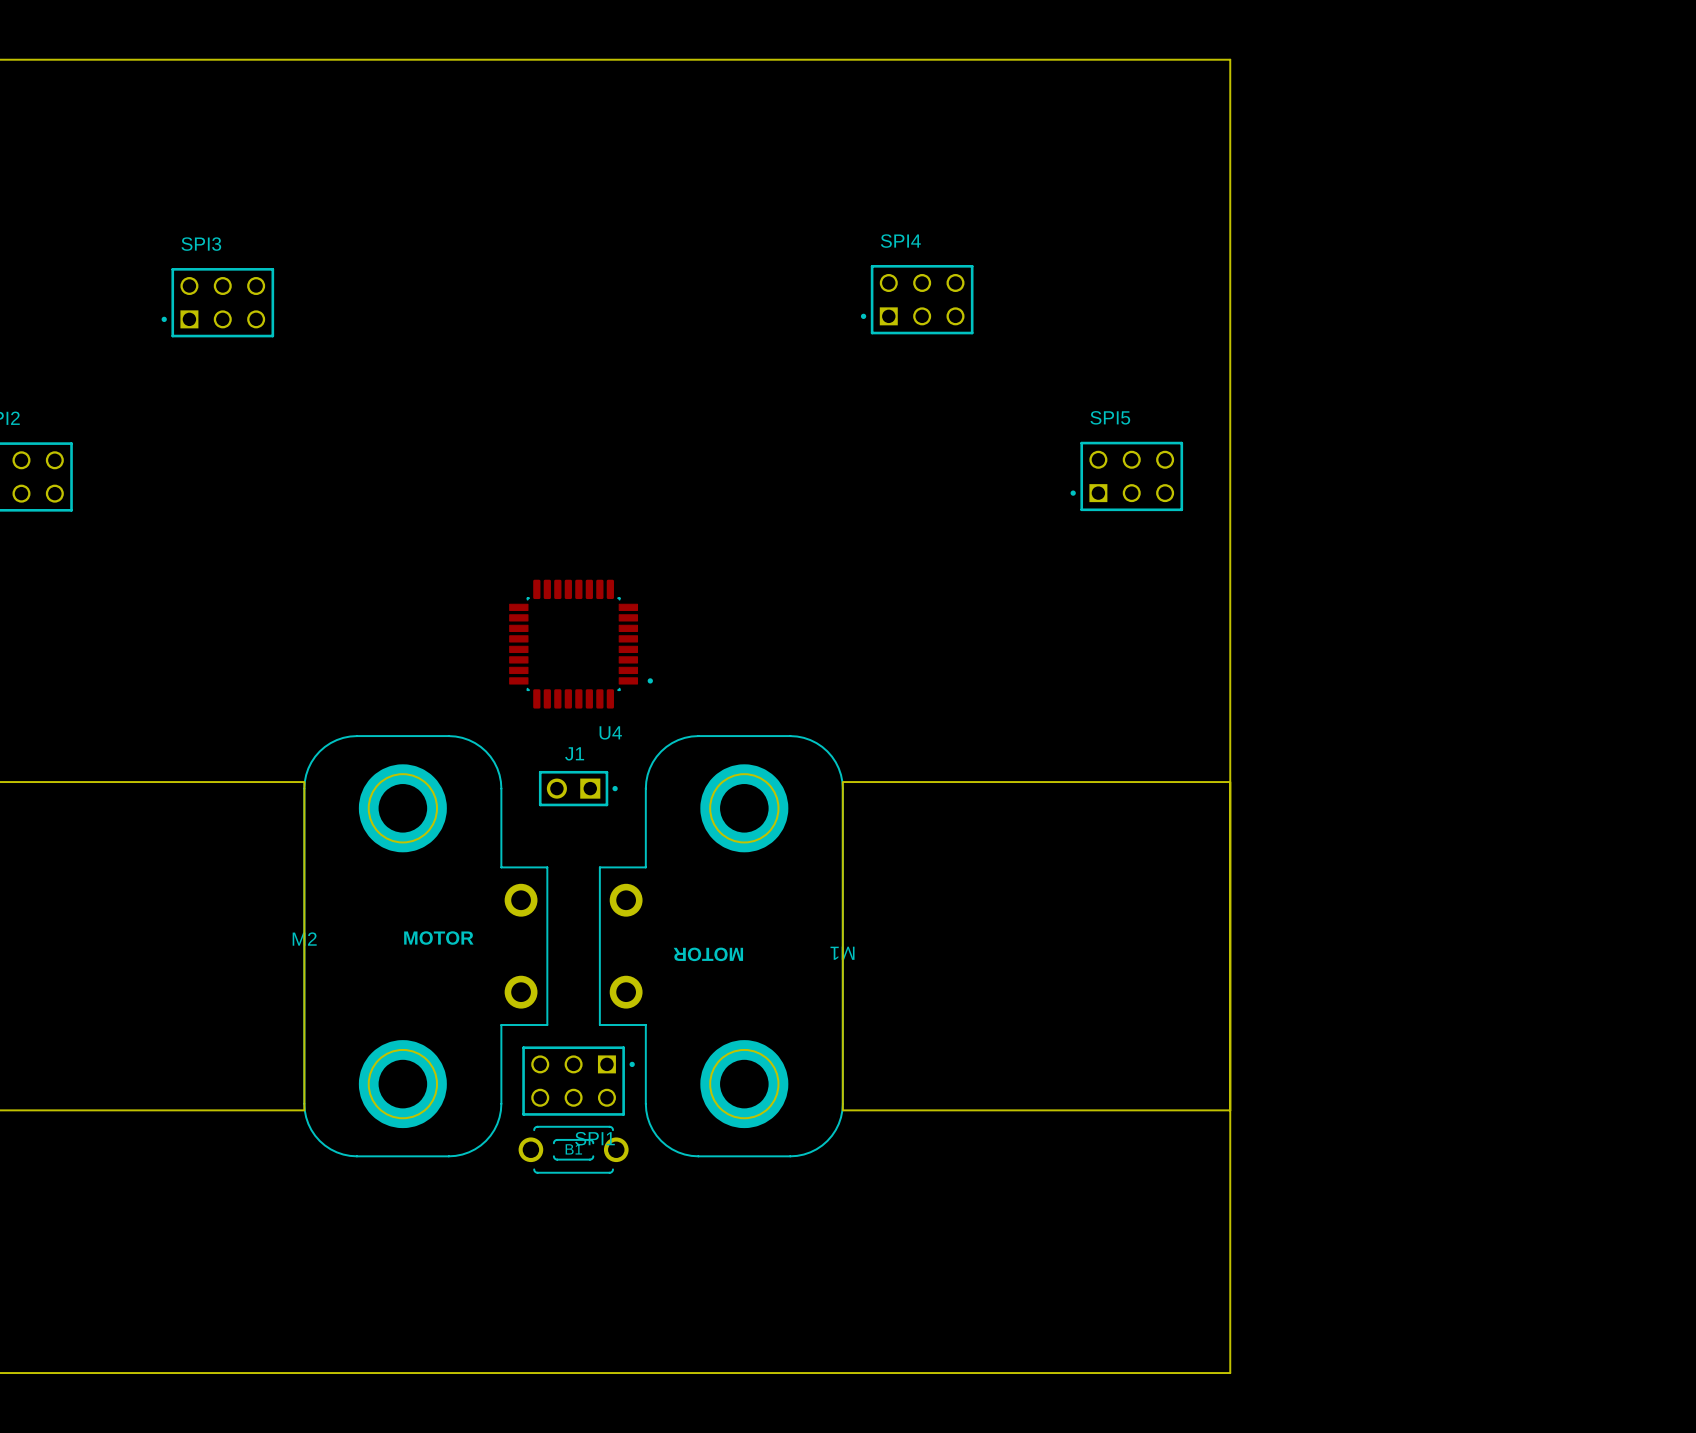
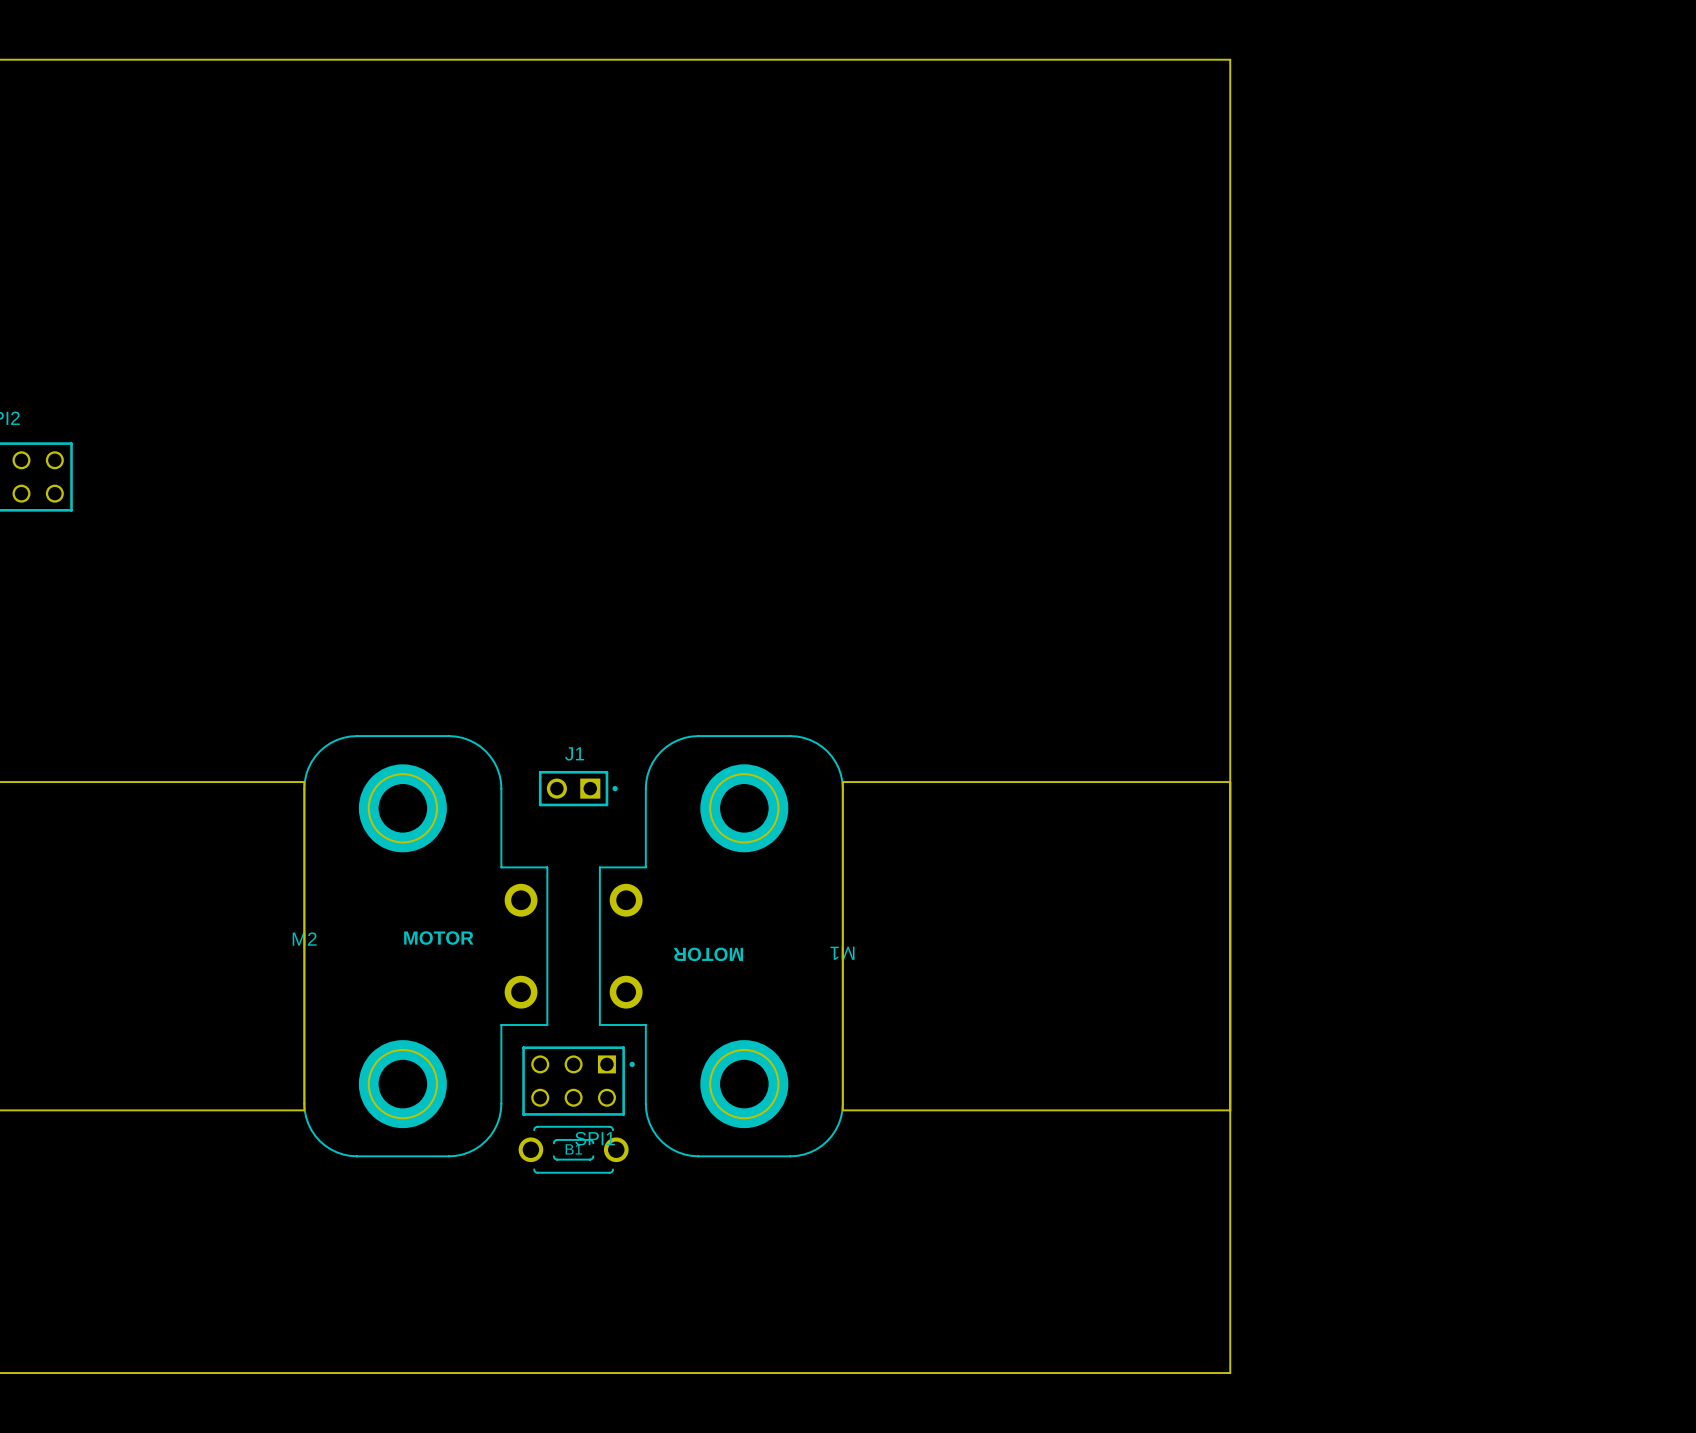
SPI4: (917, 299) -> none
SPI3: (217, 302) -> none
SPI5: (1126, 476) -> none
U4: (581, 644) -> none

